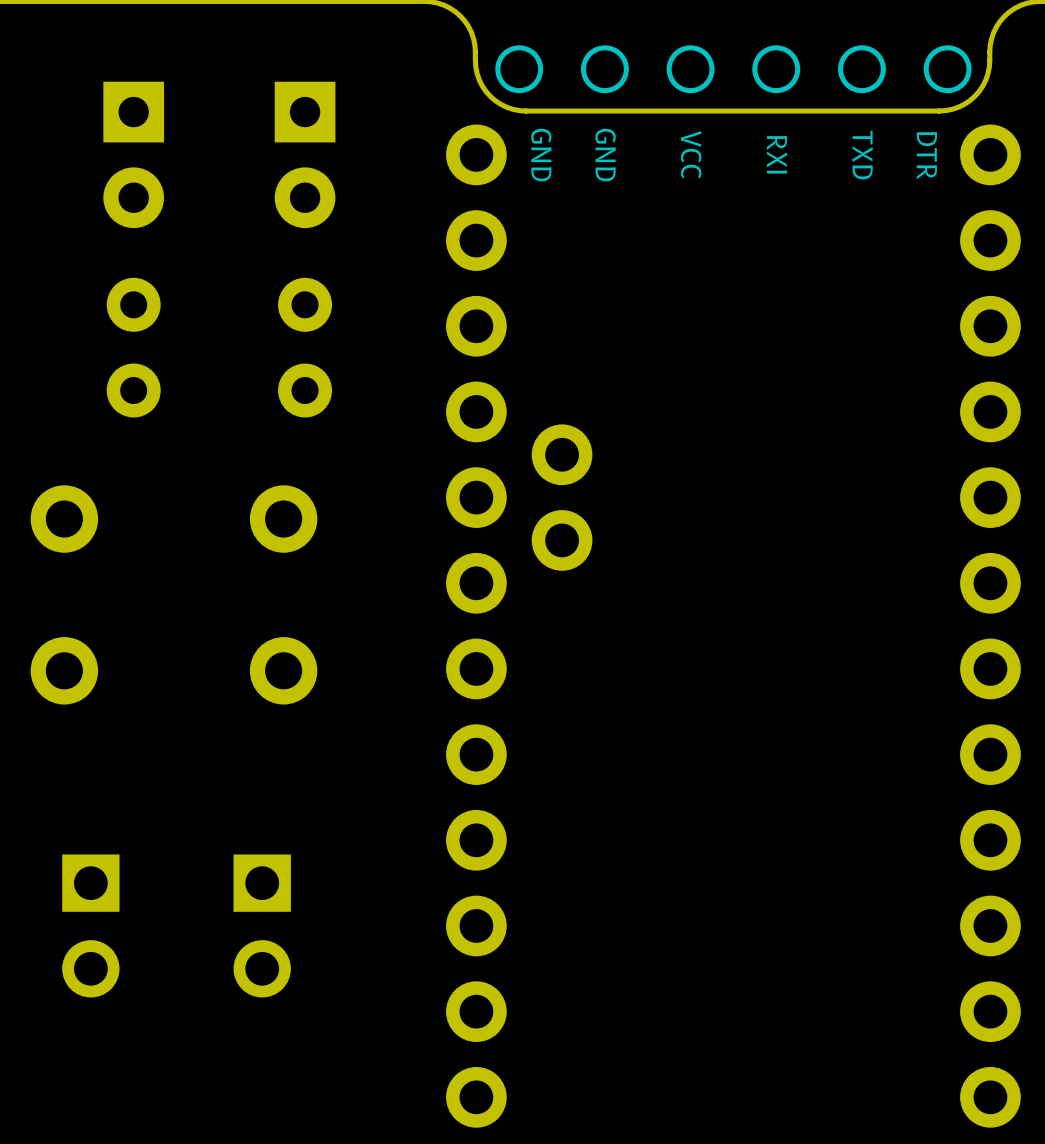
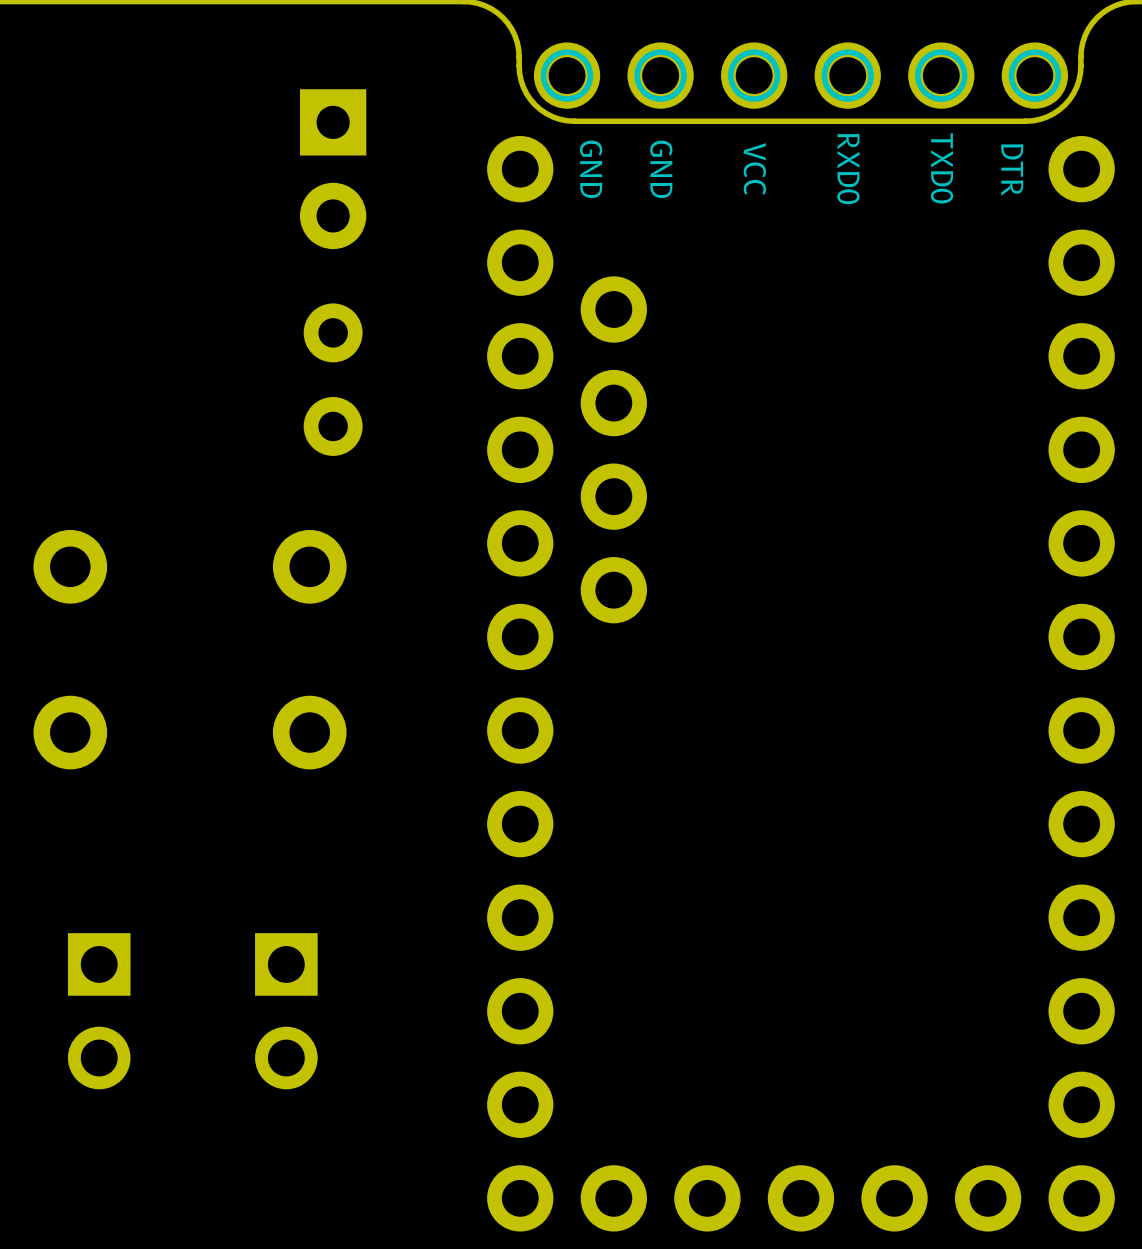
part footprint: [446, 45, 1021, 1128] -> [487, 42, 1115, 1232]
part: (133, 154) -> none
part: (133, 347) -> none

